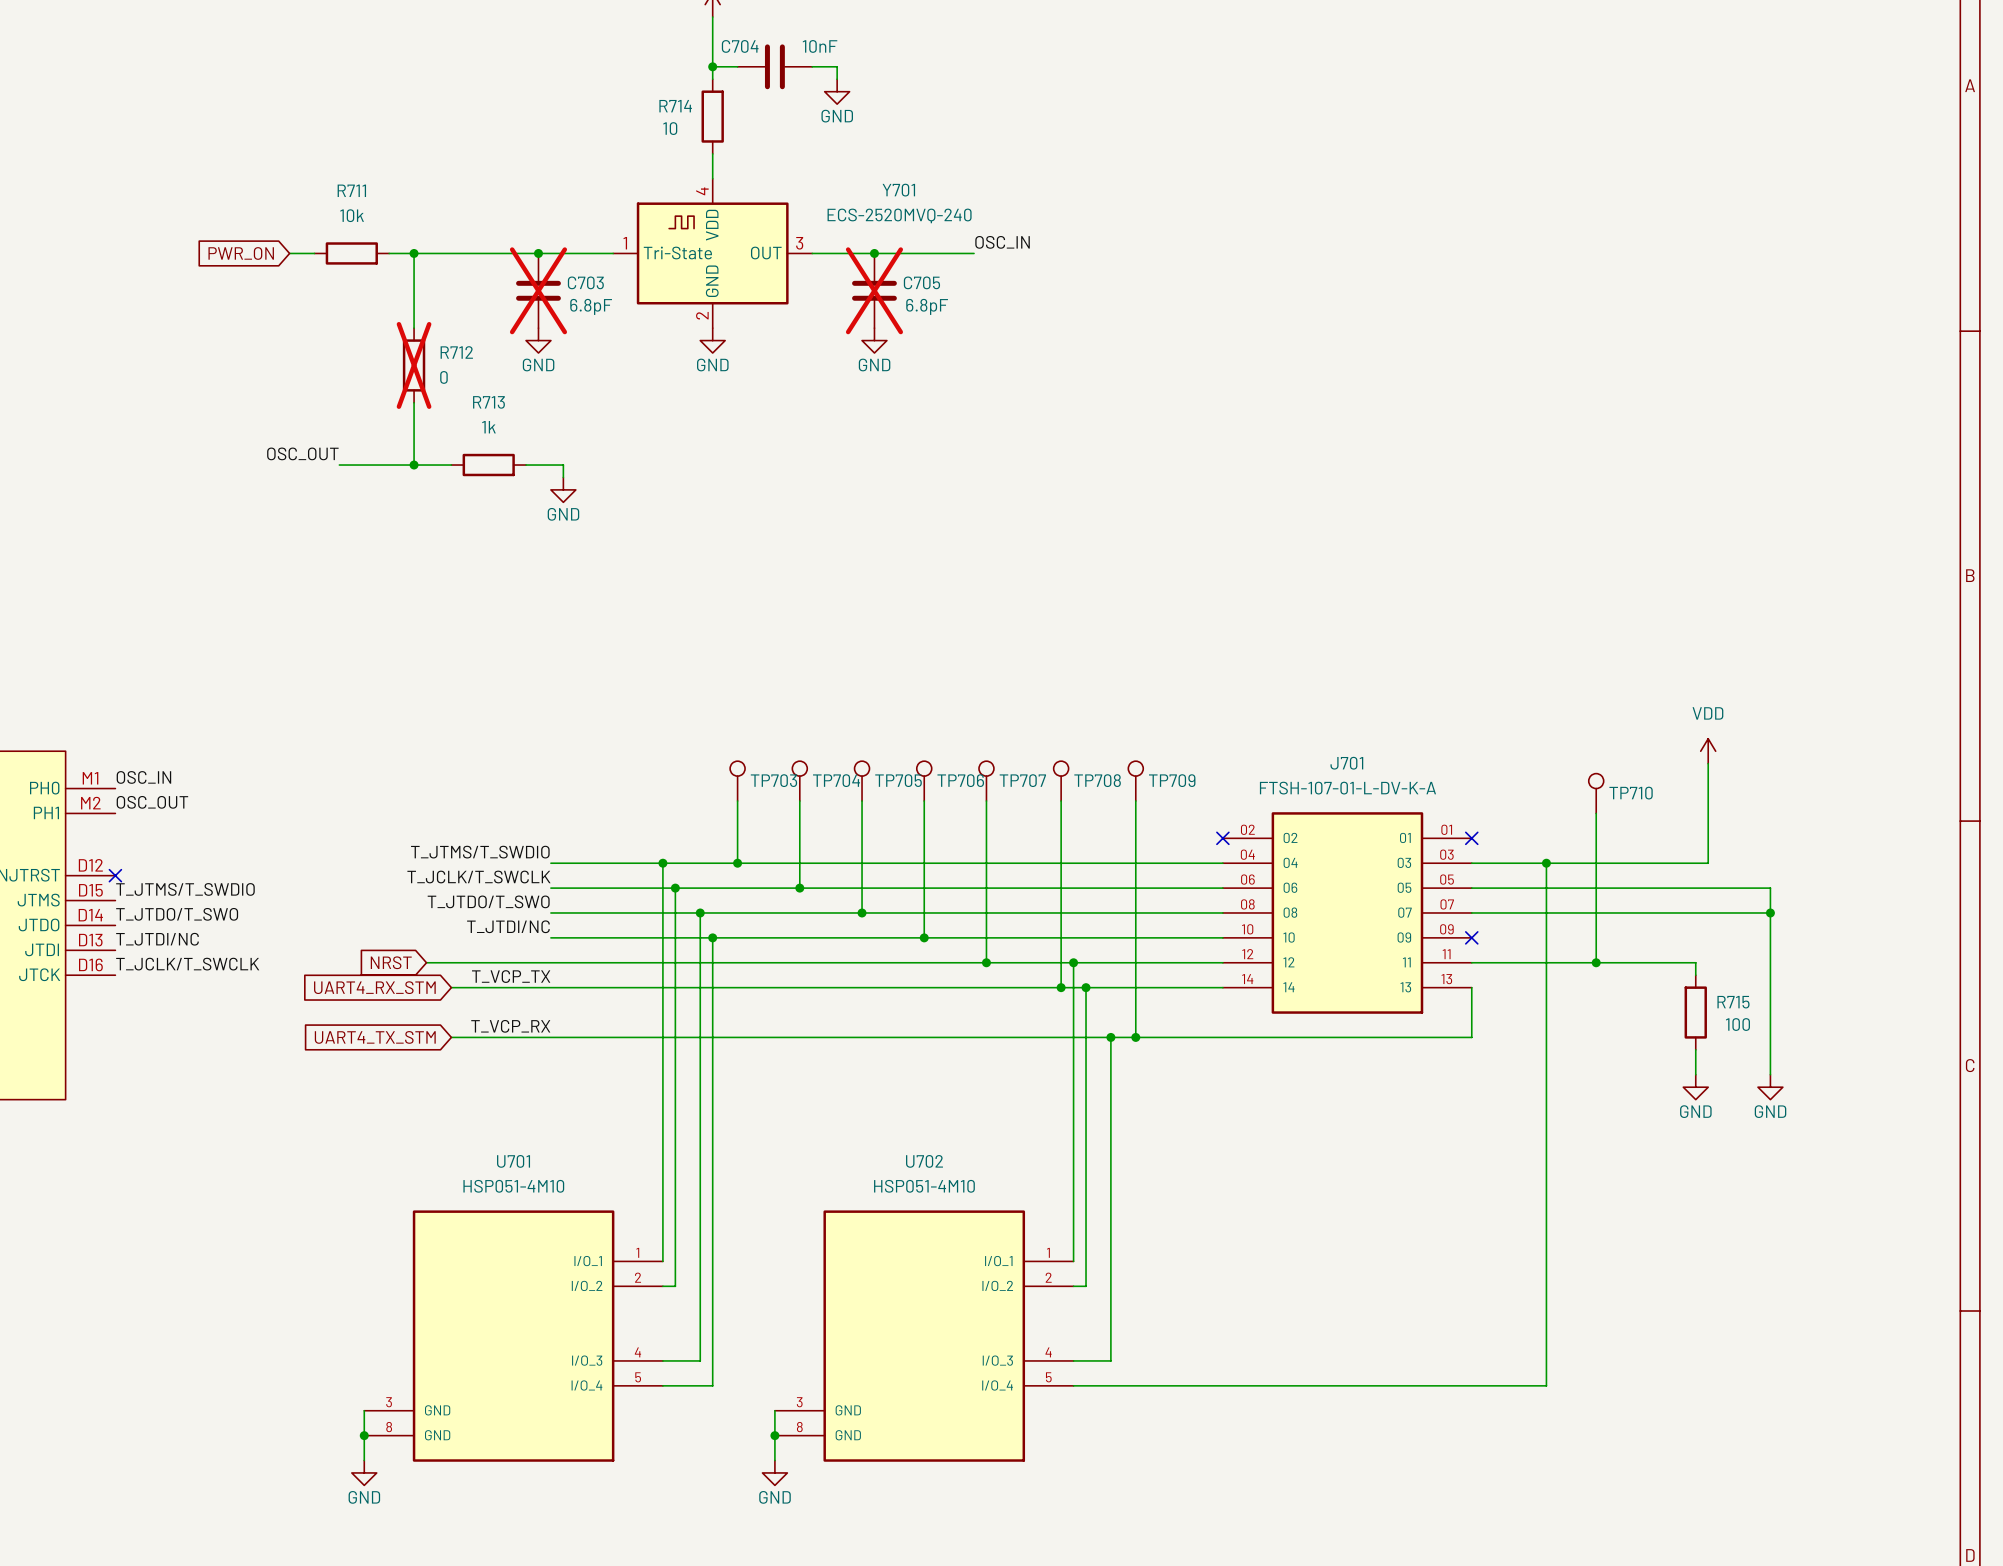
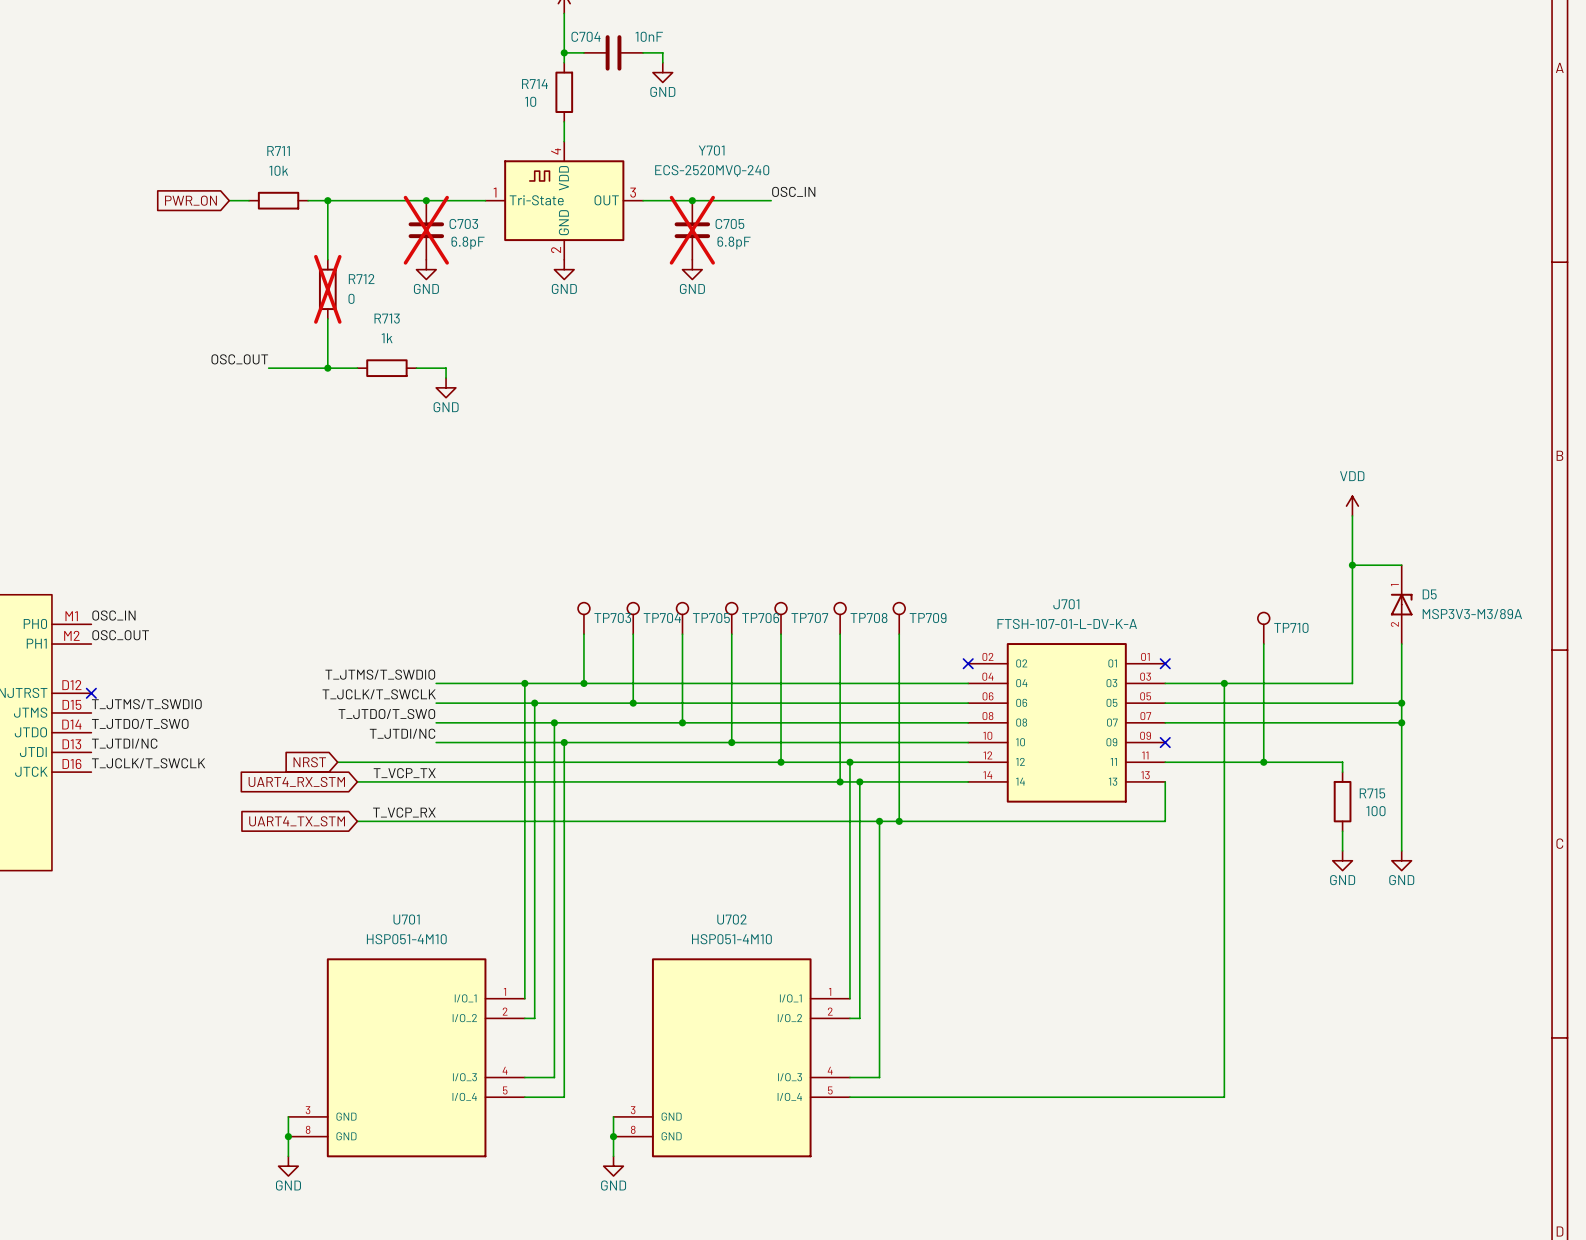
wire: none -> (1352, 515) (1352, 604)
wire: none -> (1352, 565) (1401, 565)
junction: none -> (1352, 565)
power symbol position: VDD (1708, 751) -> VDD (1352, 506)
D5: none -> MSP3V3-M3/89A (1401, 604)
wire: none -> (1401, 644) (1401, 703)
junction: none -> (1401, 703)

